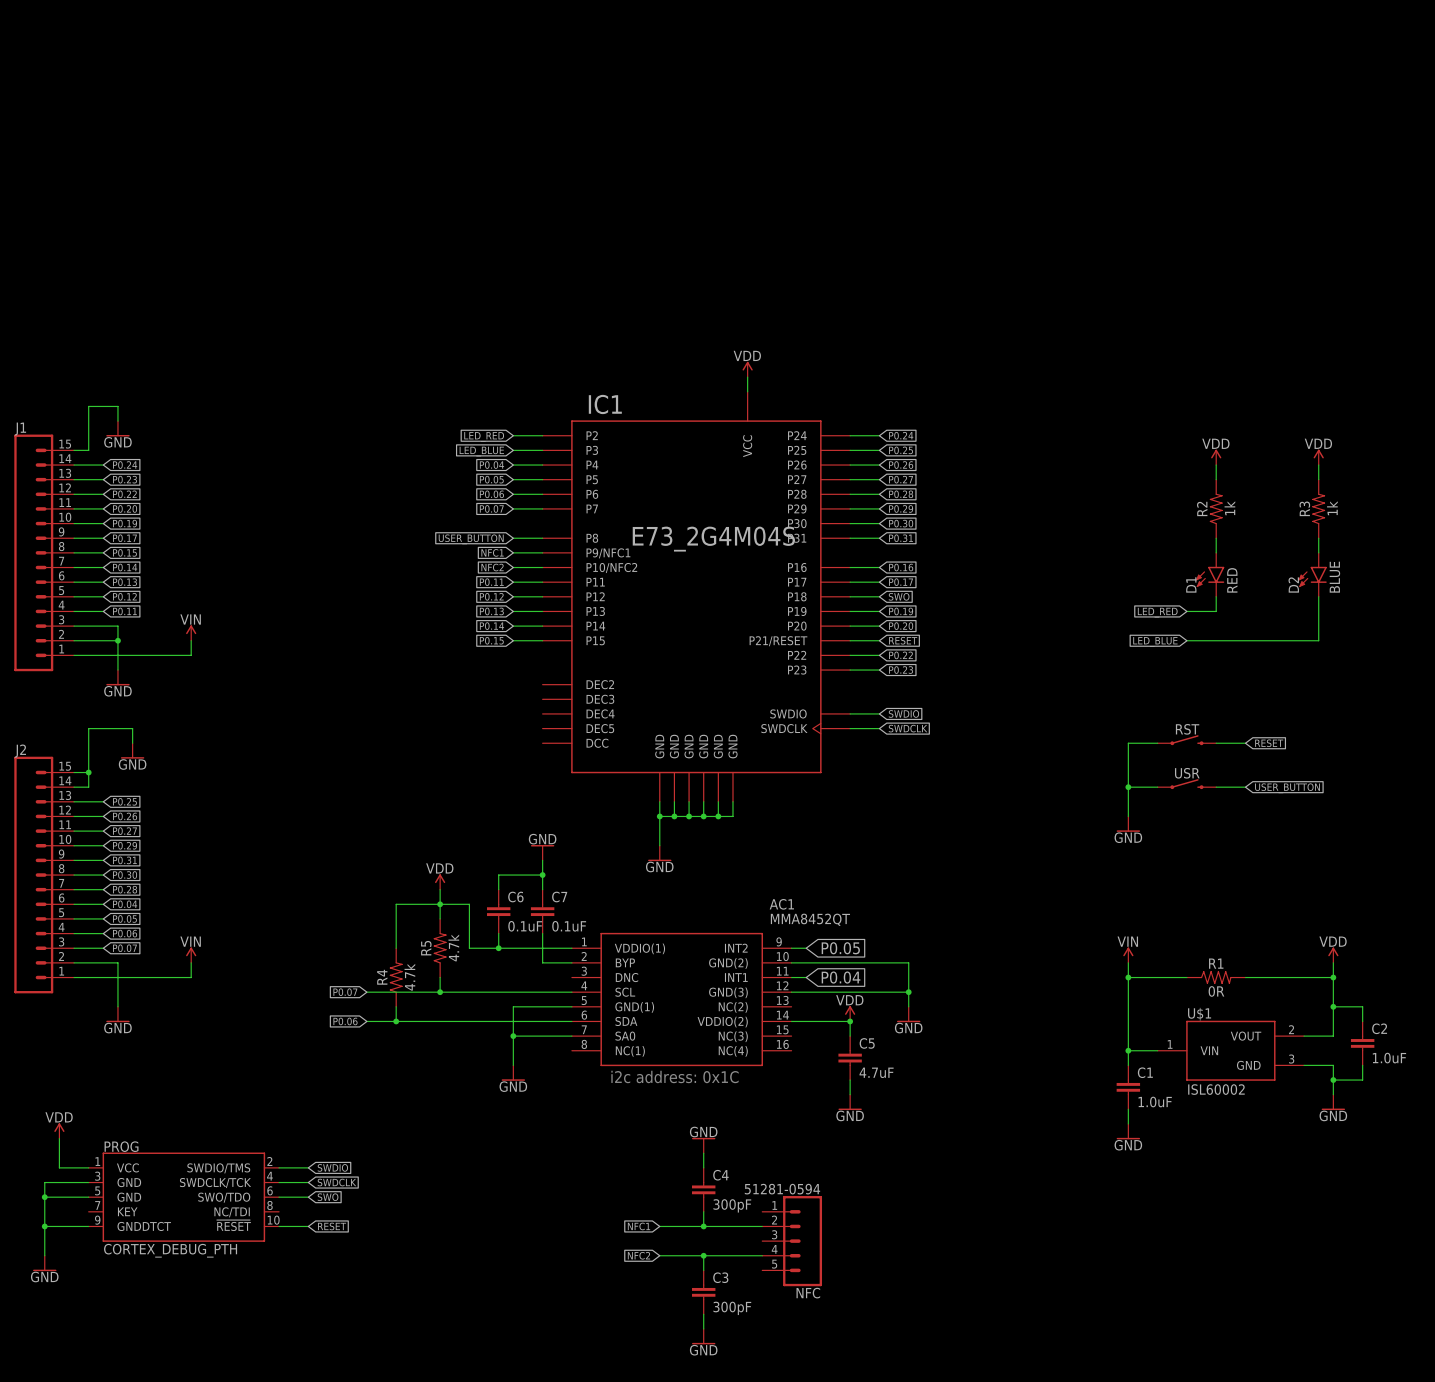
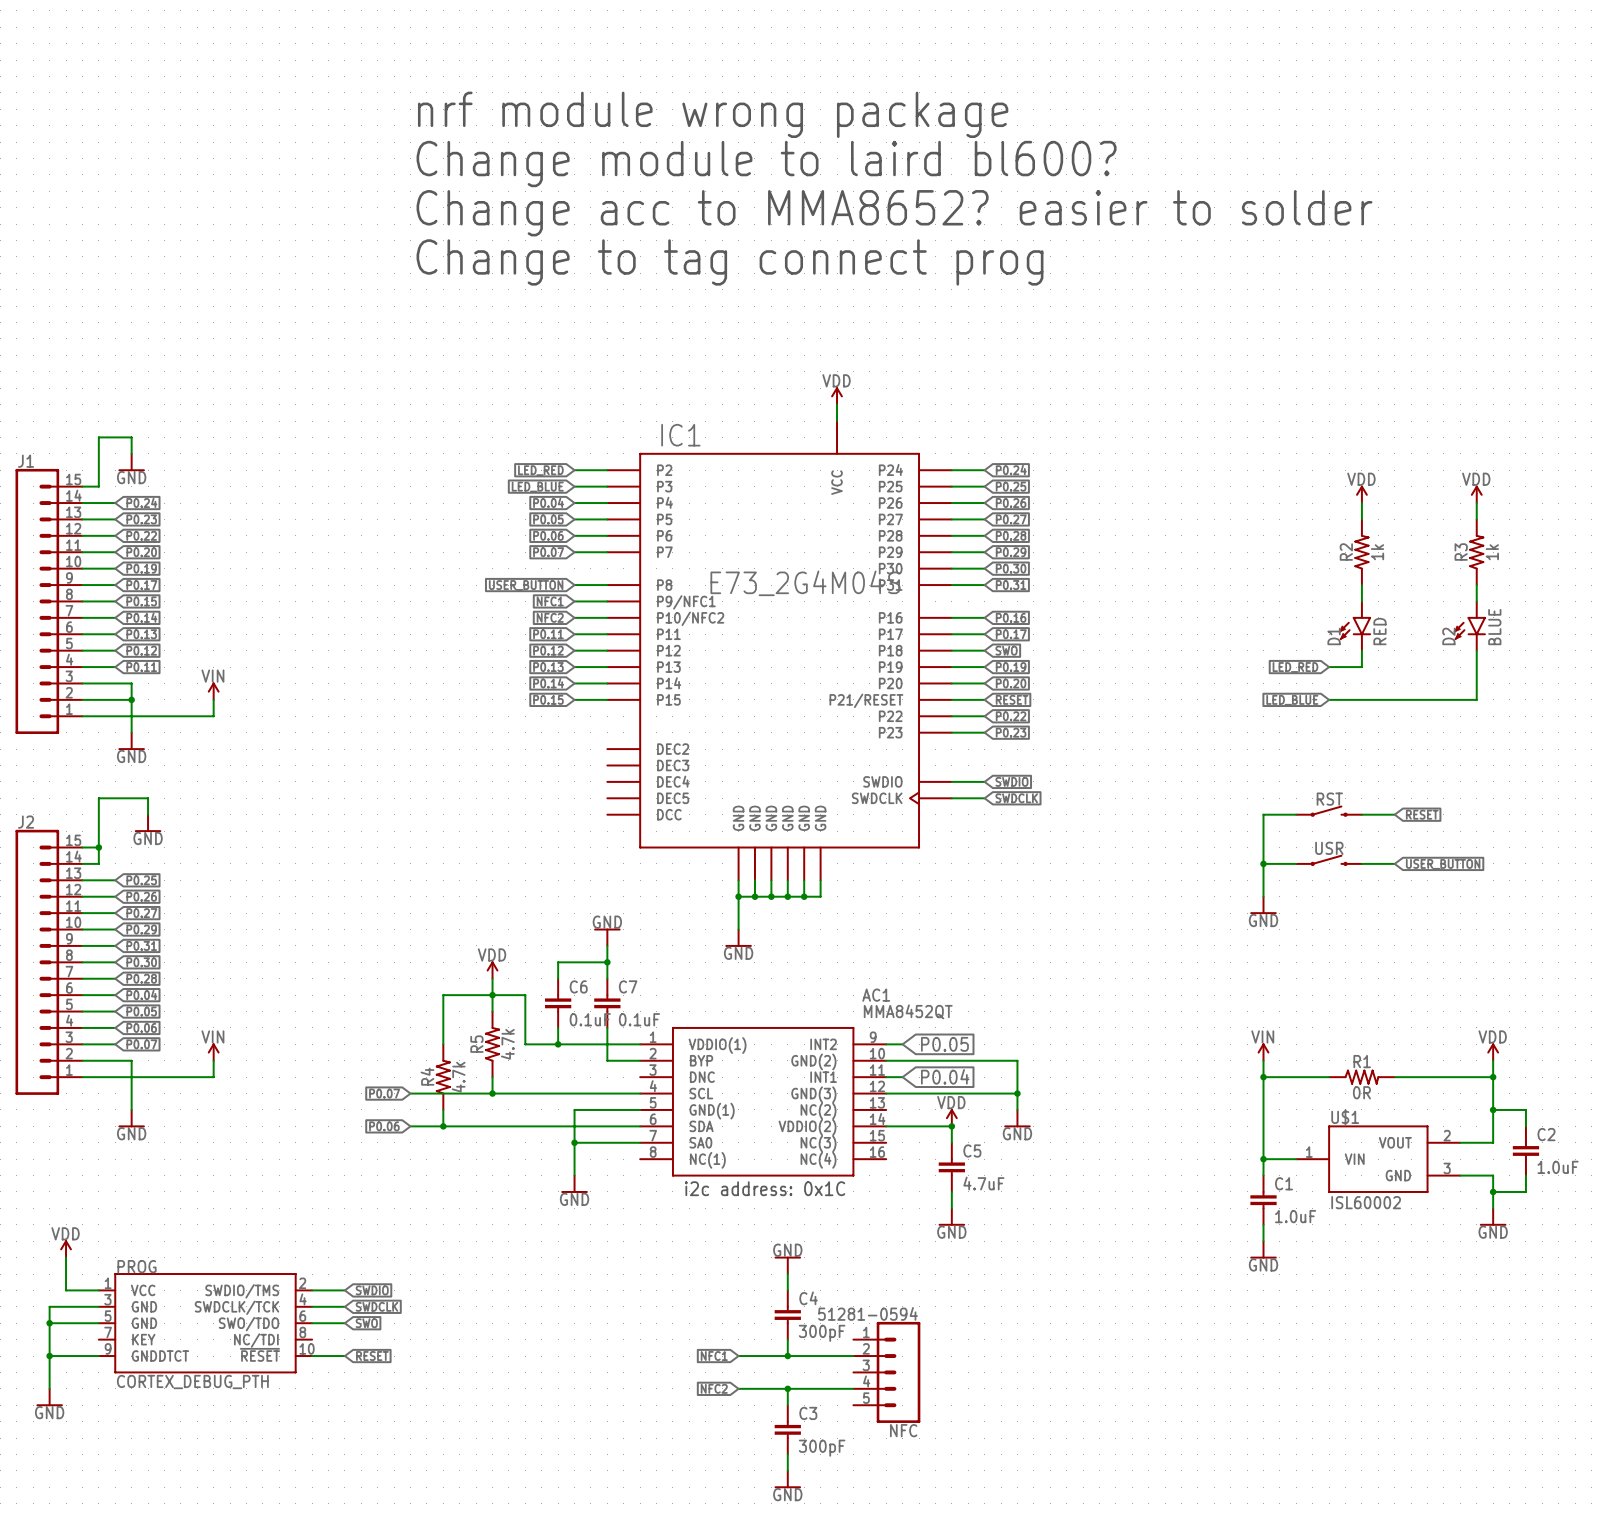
text: none -> nrf module wrong package (713, 114)
text: none -> Change module to laird bl600? (766, 164)
text: none -> Change acc to MMA8652? easier to solder (894, 213)
text: none -> Change to tag connect prog (730, 262)

